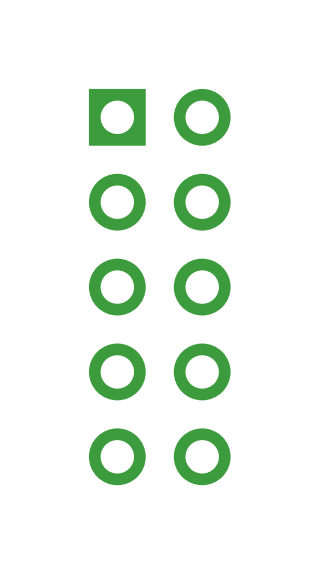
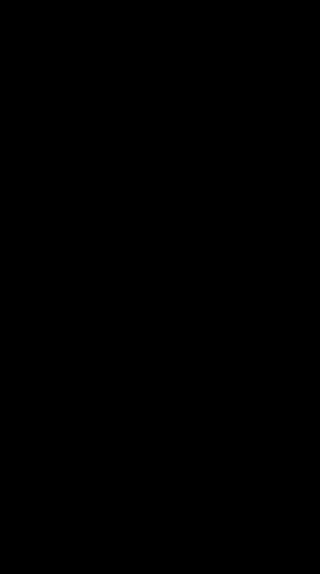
part: (159, 287) -> none

